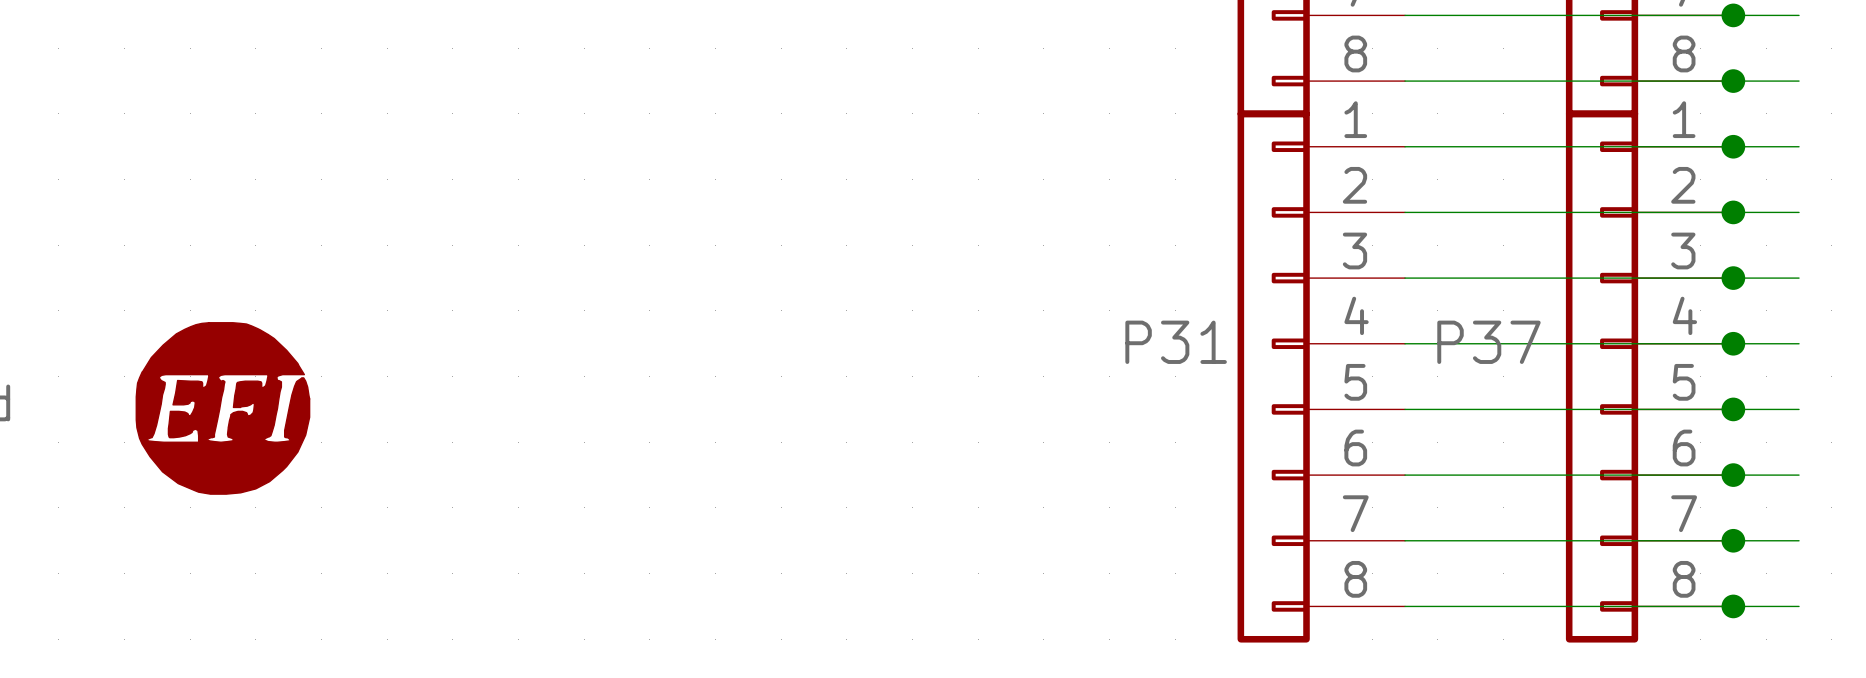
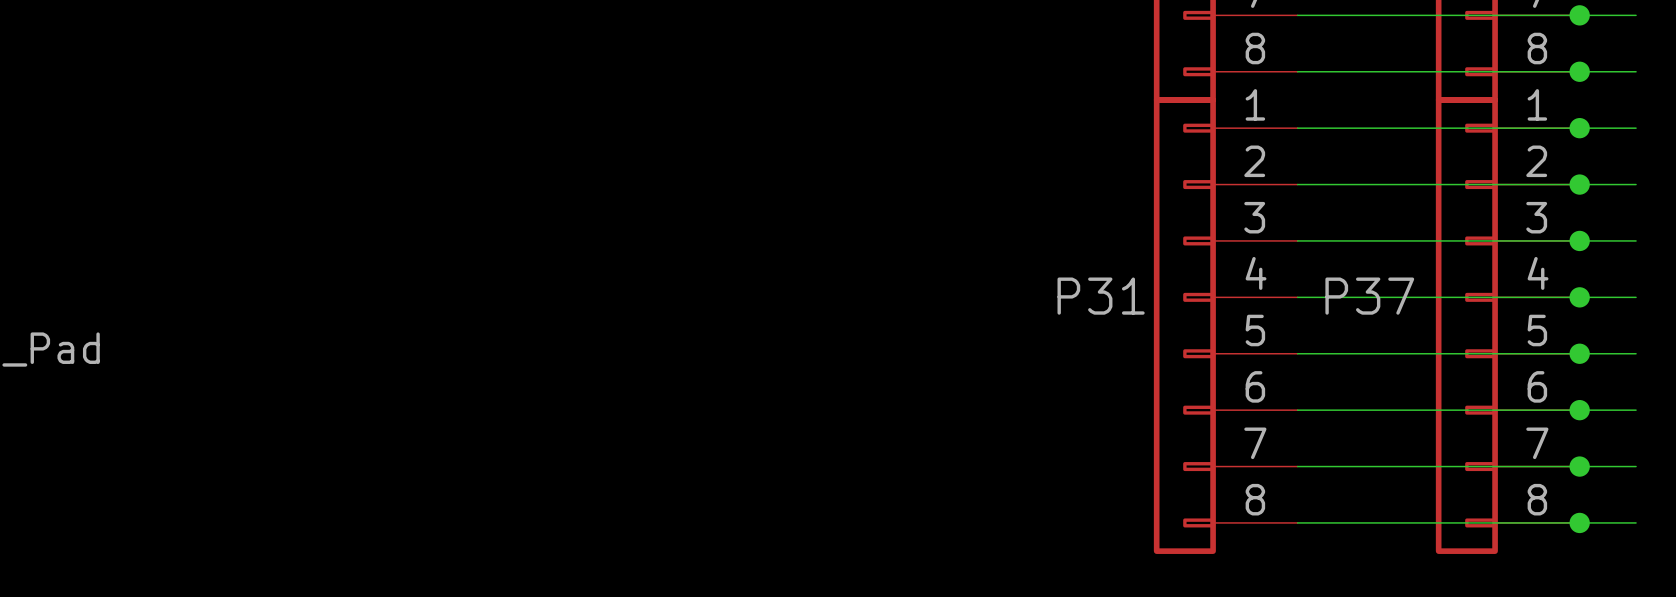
part: (222, 408) -> none

